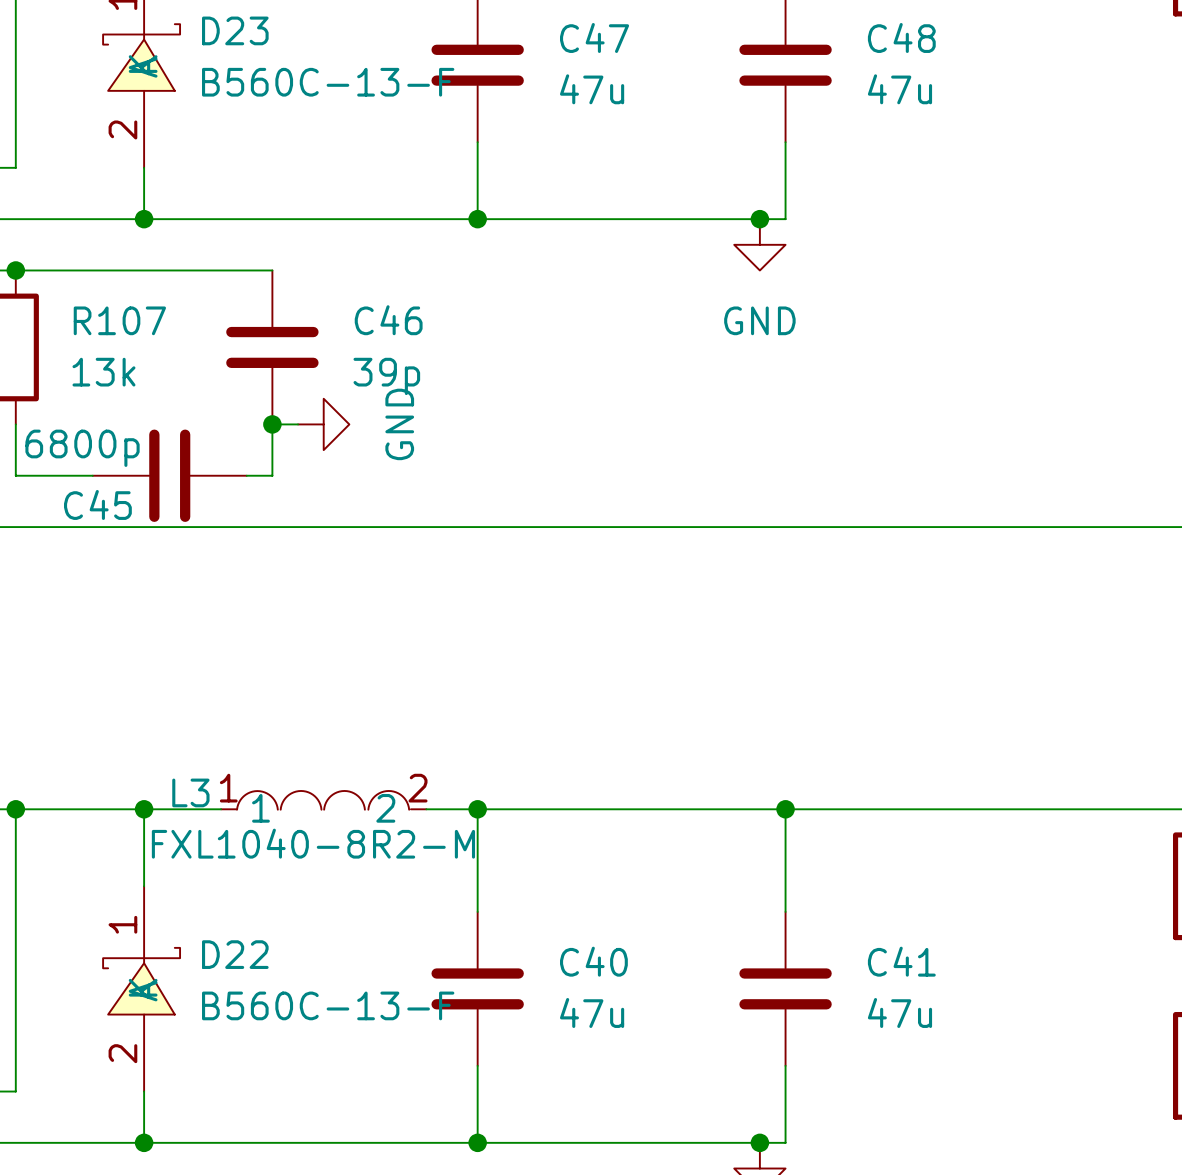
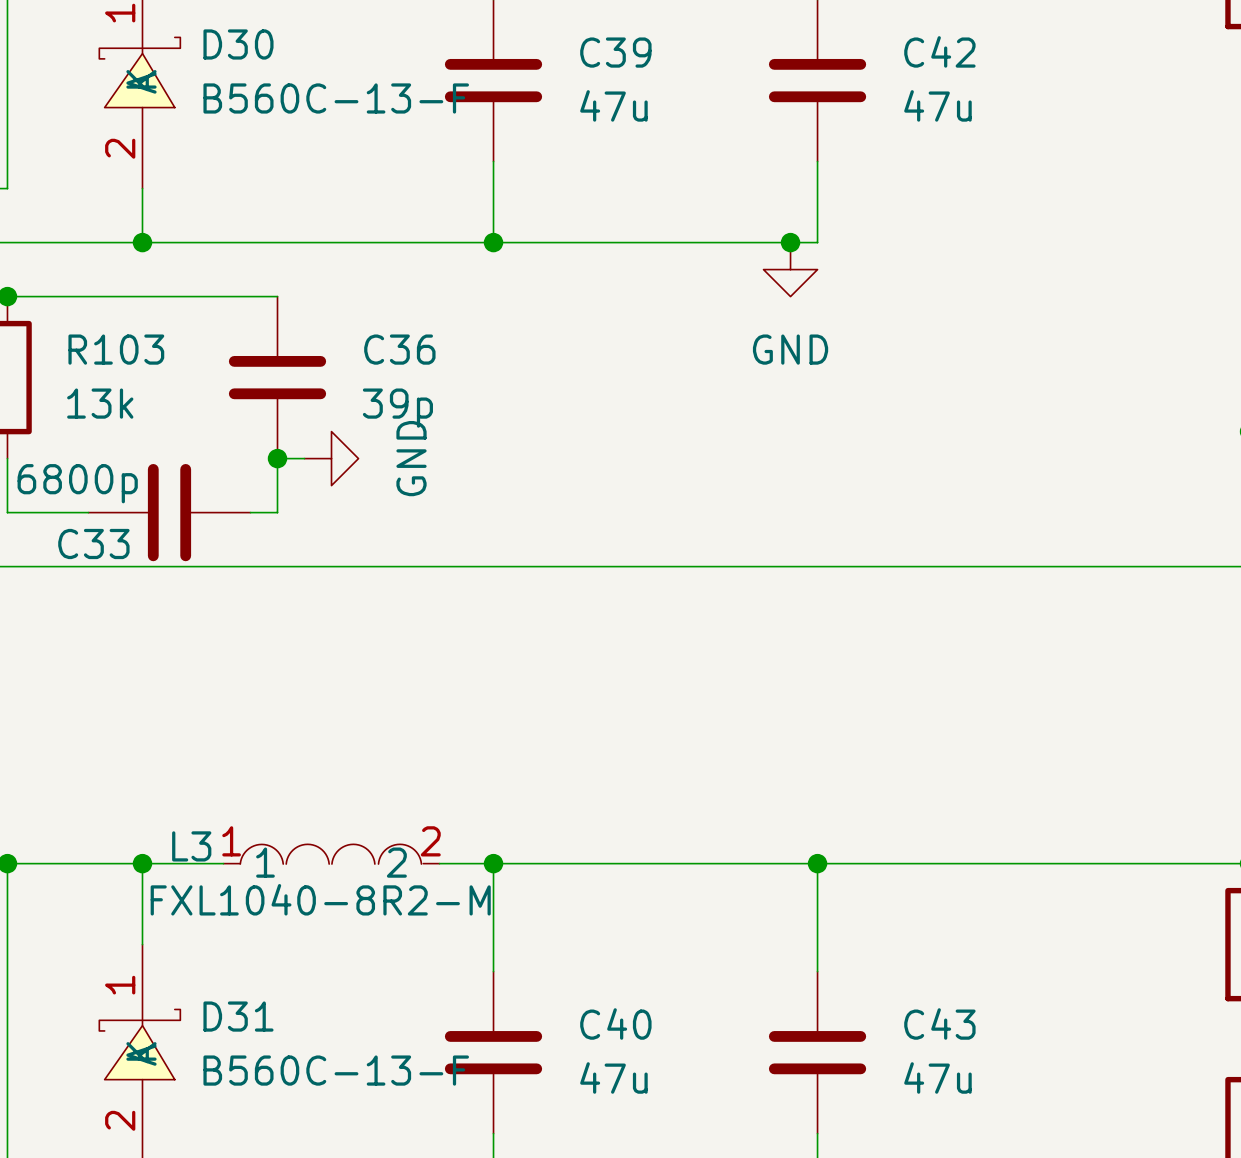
D23 name: D23 (235, 30) -> D30 (238, 44)
C47 name: C47 (594, 37) -> C39 (615, 52)
C48 name: C48 (901, 37) -> C42 (939, 51)
R107 name: R107 (119, 320) -> R103 (116, 349)
C46 name: C46 (388, 320) -> C36 (399, 349)
C45 name: C45 (97, 504) -> C33 (93, 543)
D22 name: D22 (235, 954) -> D31 (238, 1016)
C41 name: C41 (901, 961) -> C43 (939, 1023)

